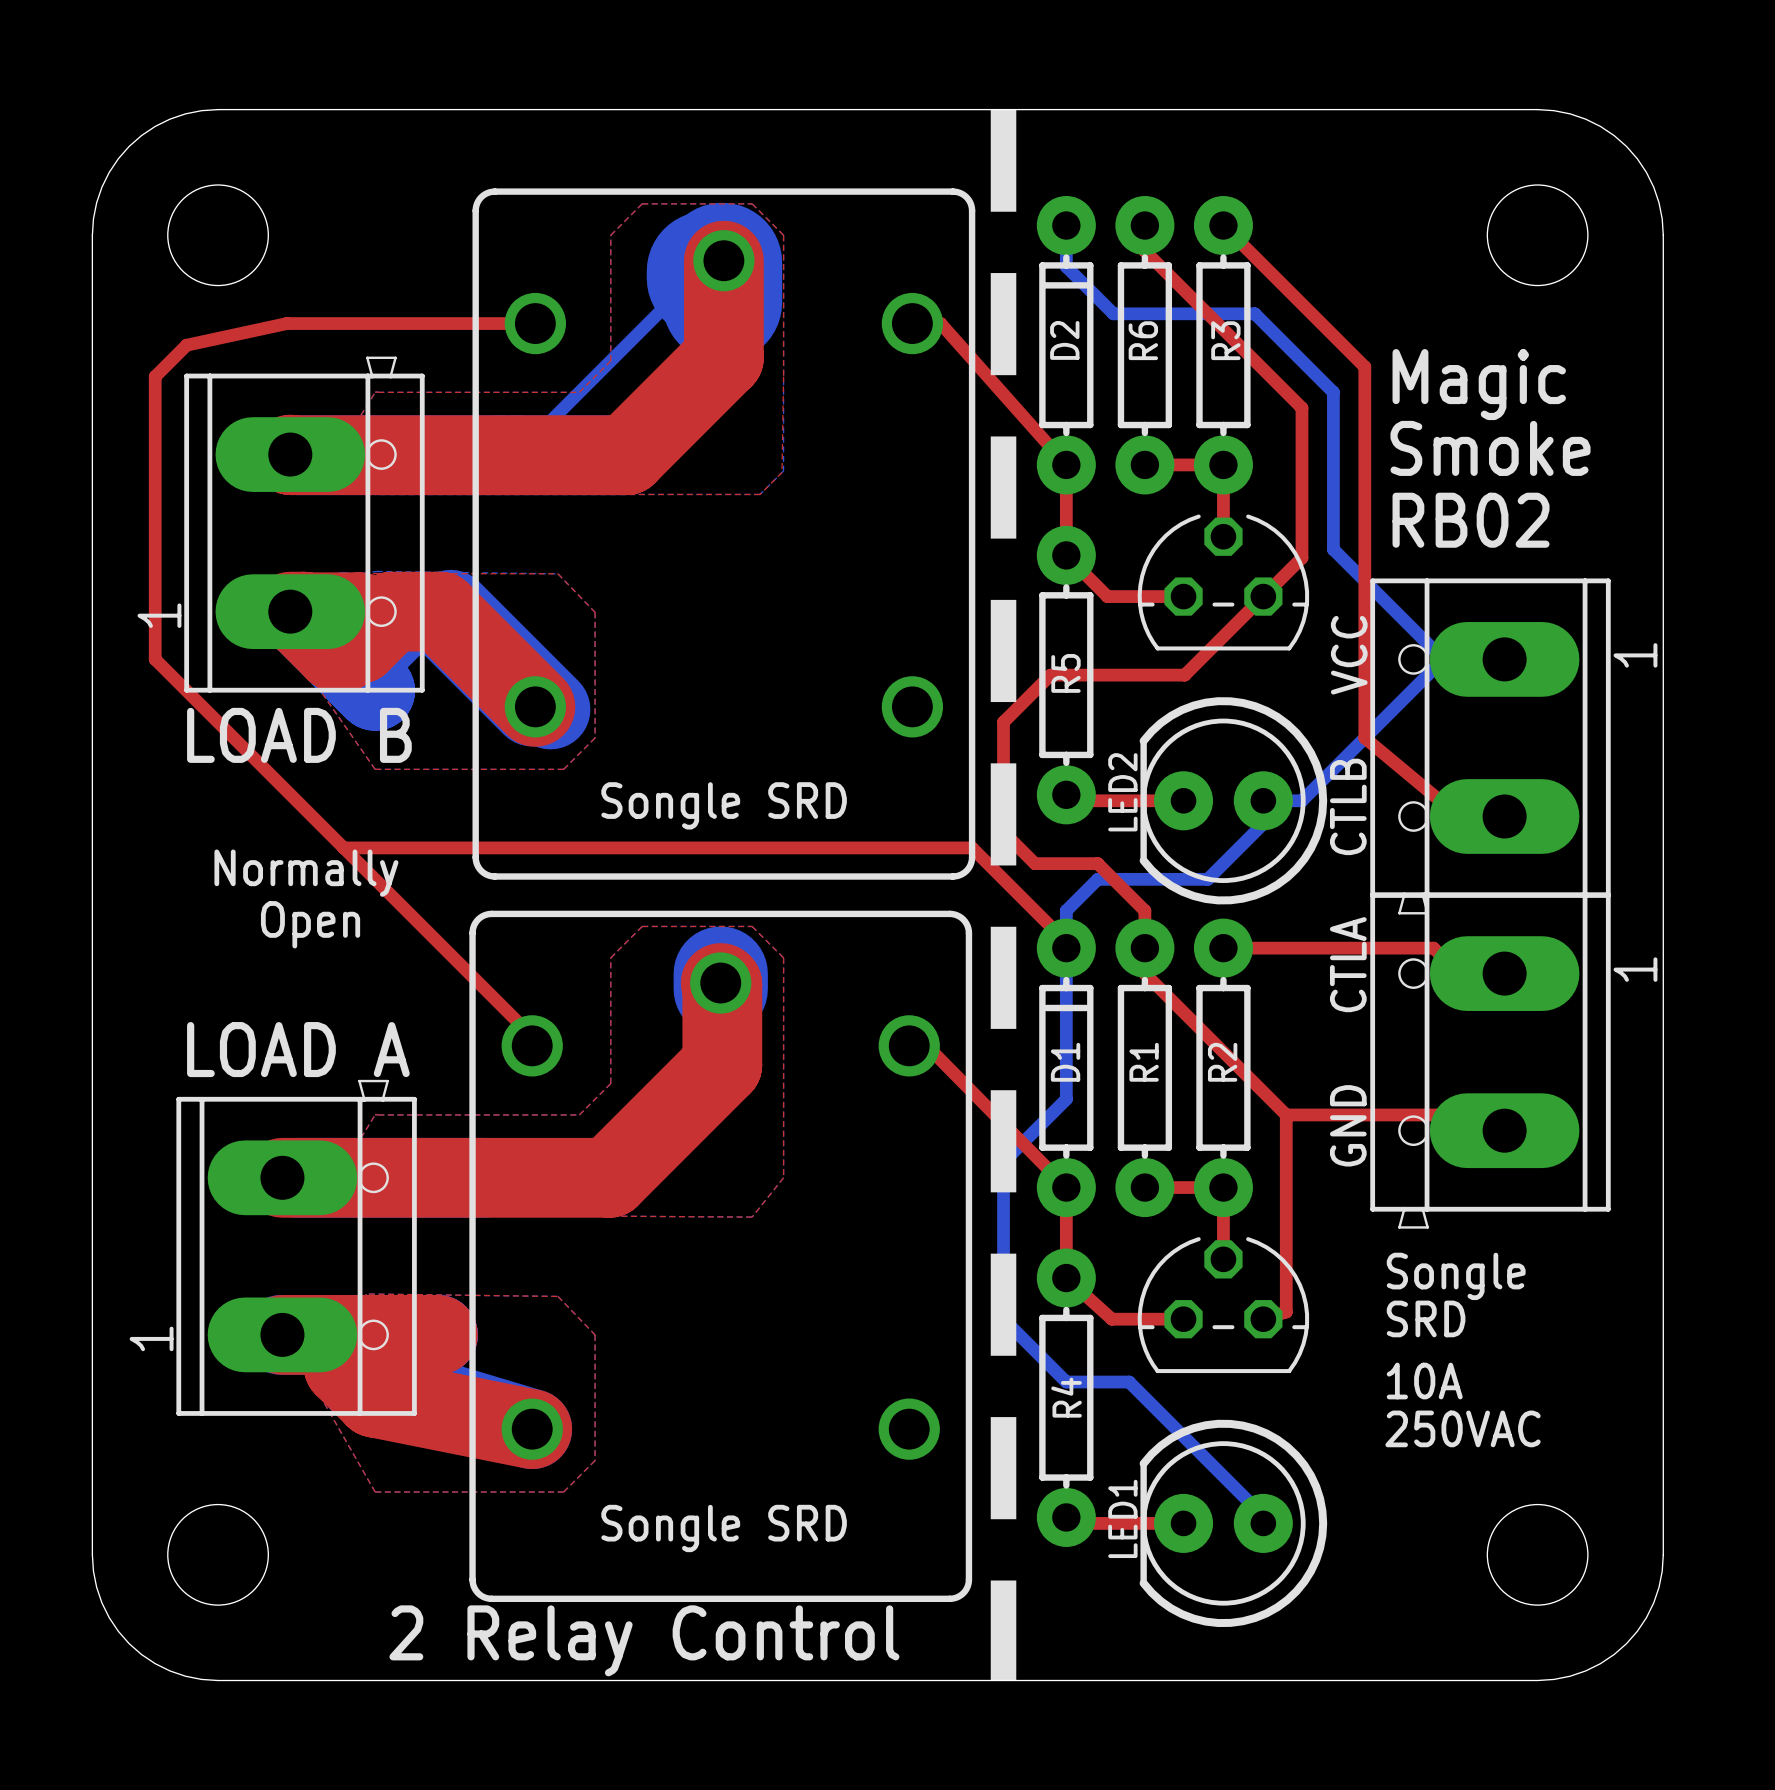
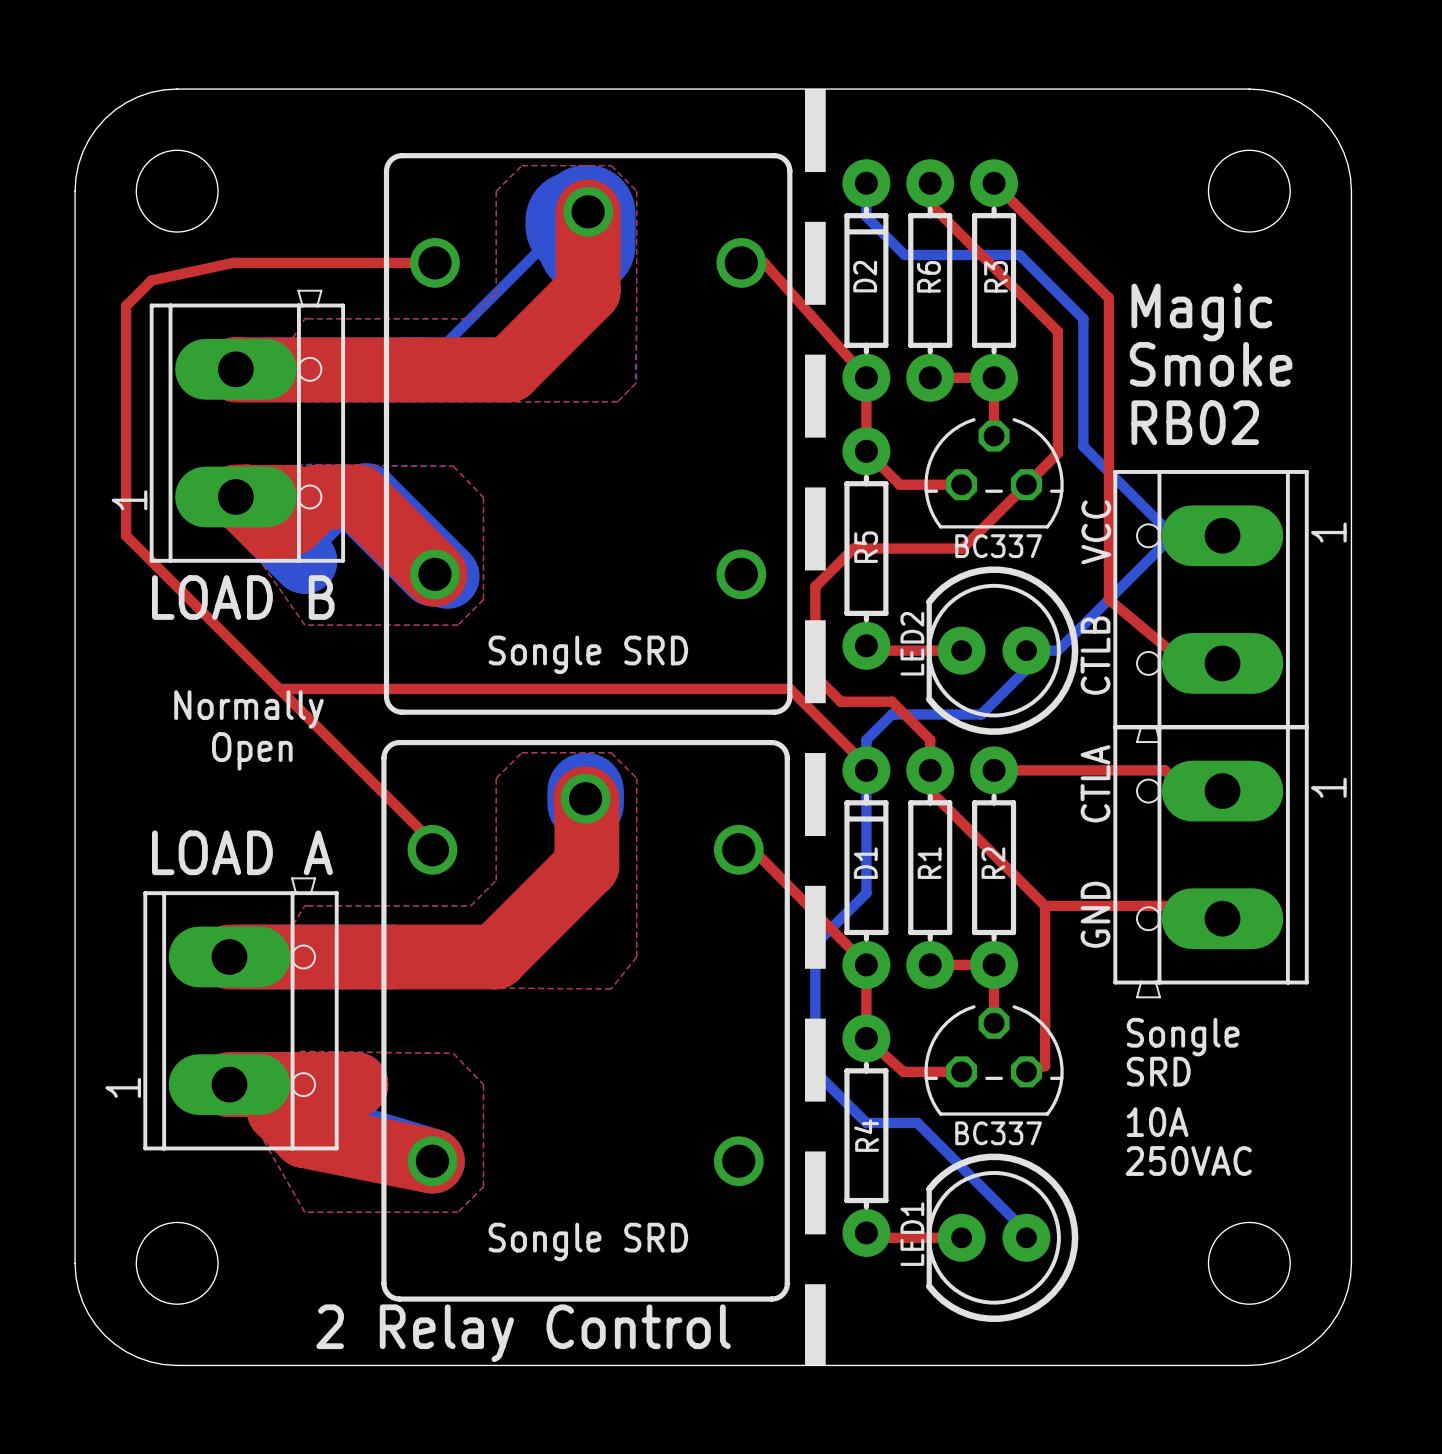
part value: none -> BC337 (998, 546)
part value: none -> BC337 (998, 1133)

